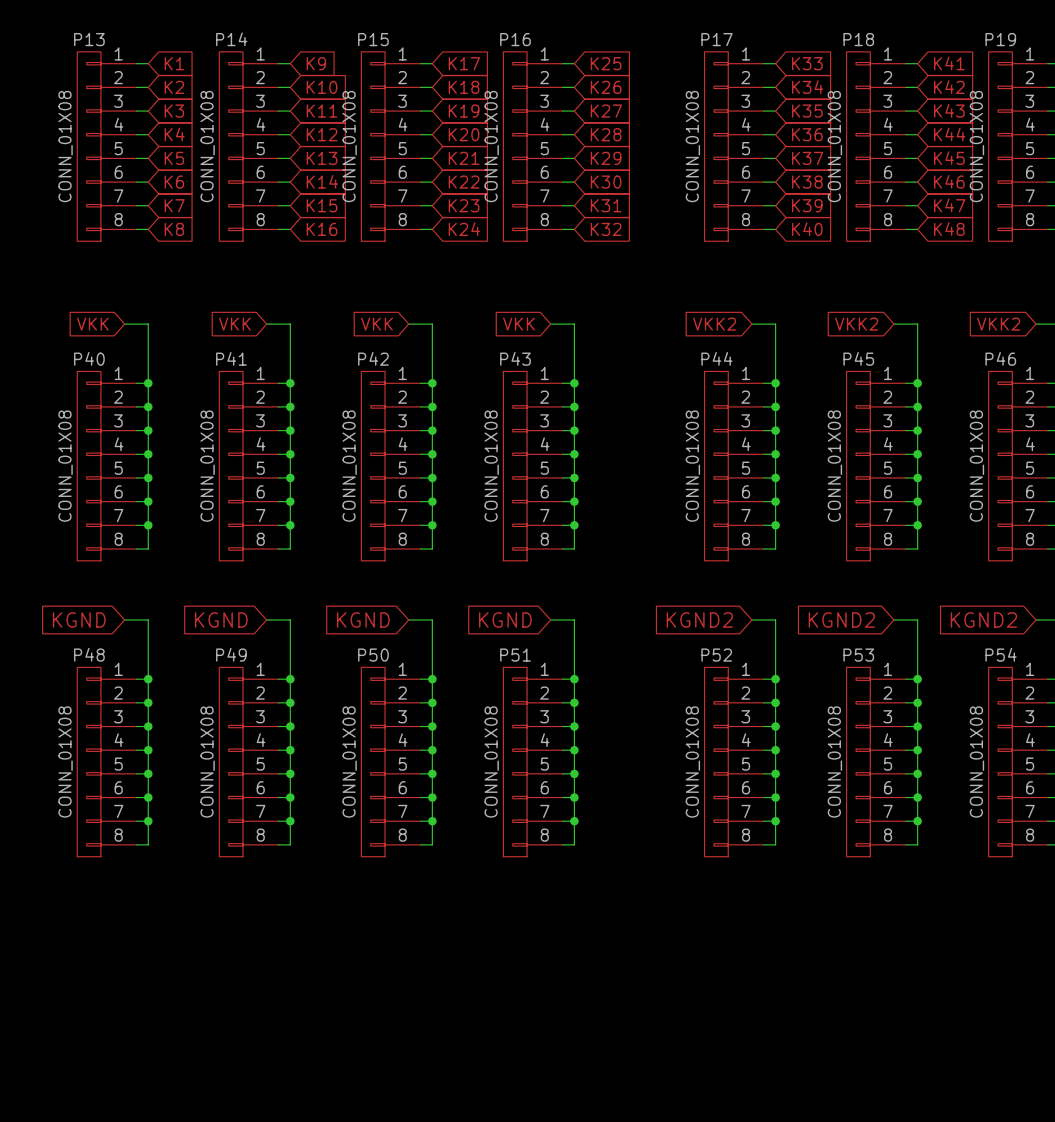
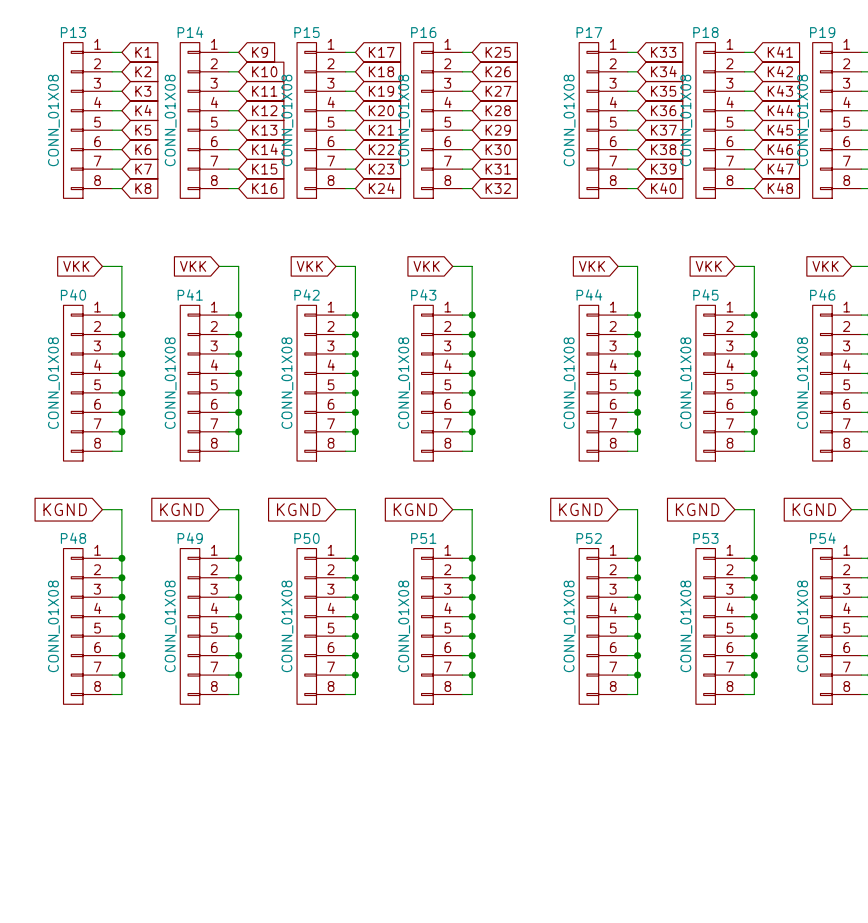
global label: VKK2 (714, 324) -> VKK (592, 266)
global label: VKK2 (856, 324) -> VKK (708, 266)
global label: VKK2 (998, 324) -> VKK (825, 266)
global label: KGND2 (699, 620) -> KGND (580, 509)
global label: KGND2 (841, 620) -> KGND (697, 509)
global label: KGND2 (983, 620) -> KGND (814, 509)

